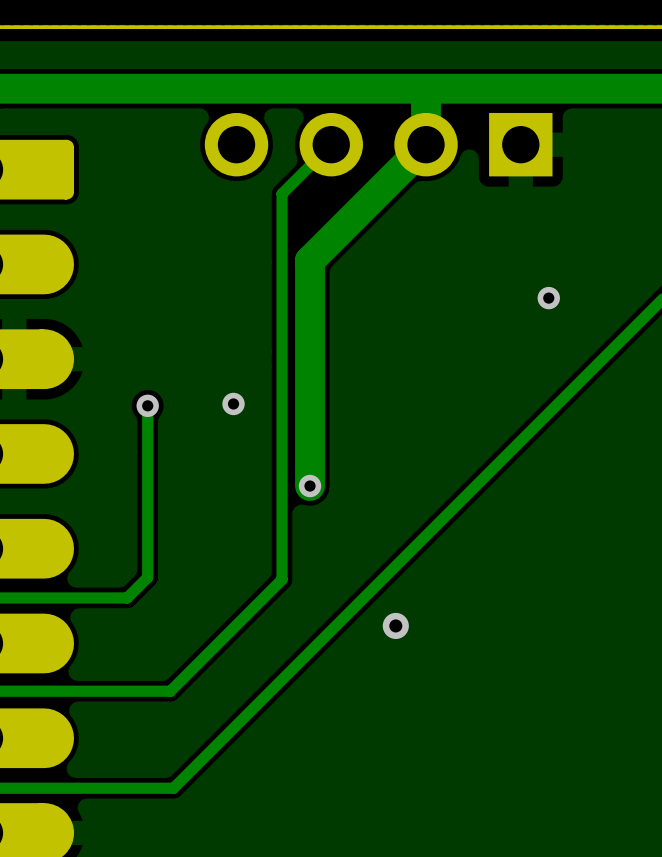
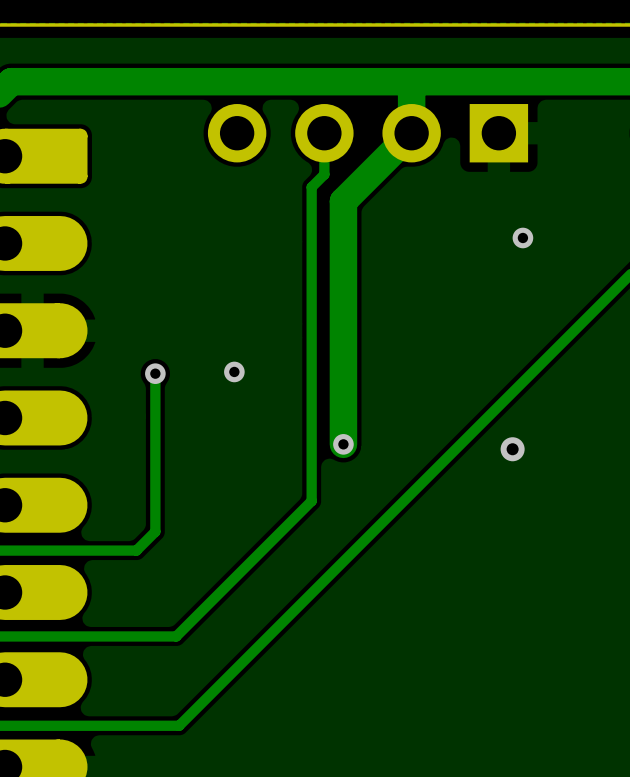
track: (331, 144) (282, 193) (282, 579) -> (324, 133) (324, 174) (311, 187) (311, 501) (279, 533)
track: (351, 218) (310, 260) (310, 486) -> (343, 201) (343, 444)
via position: (548, 298) -> (522, 237)
via position: (310, 486) -> (343, 444)
via position: (395, 625) -> (512, 449)

